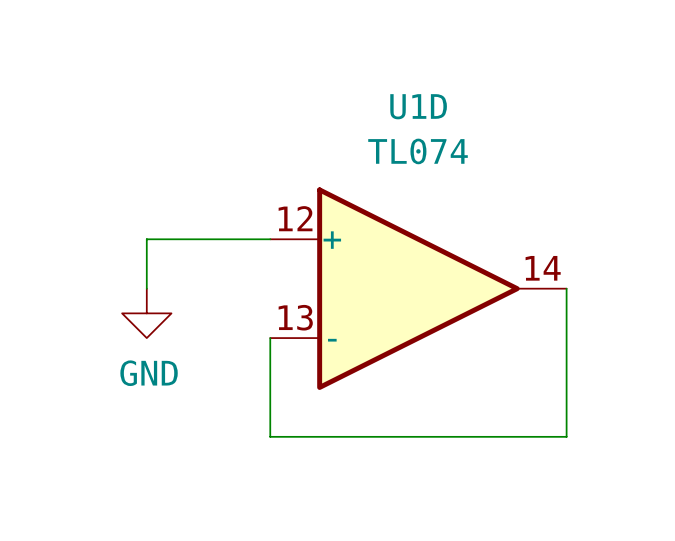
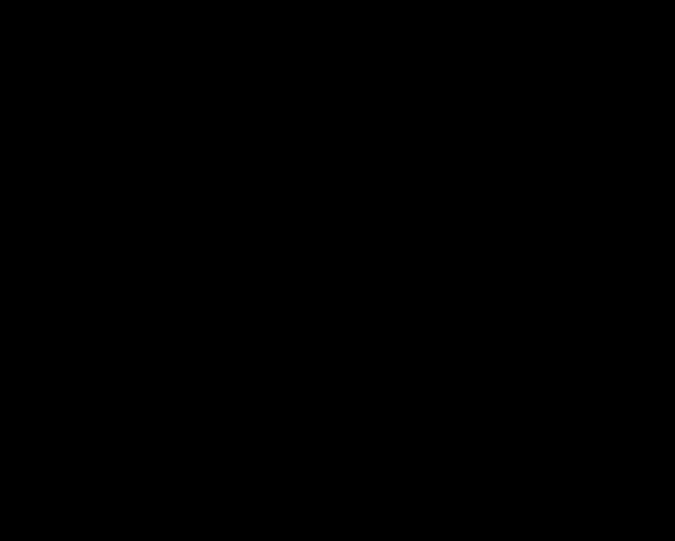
wire: (270, 239) (146, 239) (146, 288) -> none
U1D: TL074 (418, 288) -> none
wire: (566, 288) (566, 436) (270, 436) (270, 338) -> none
power symbol: GND (146, 313) -> none

